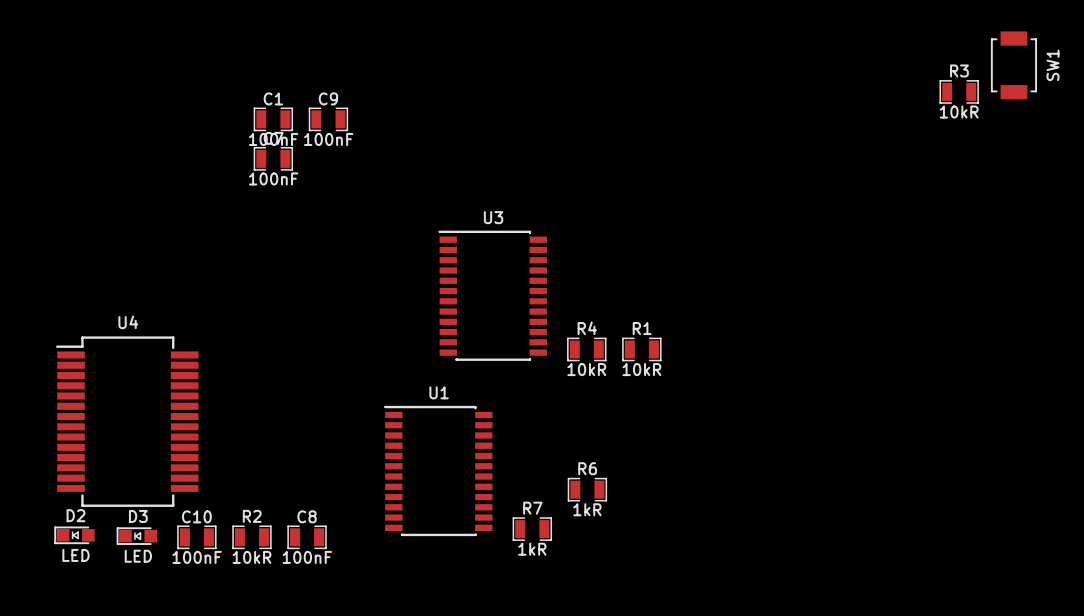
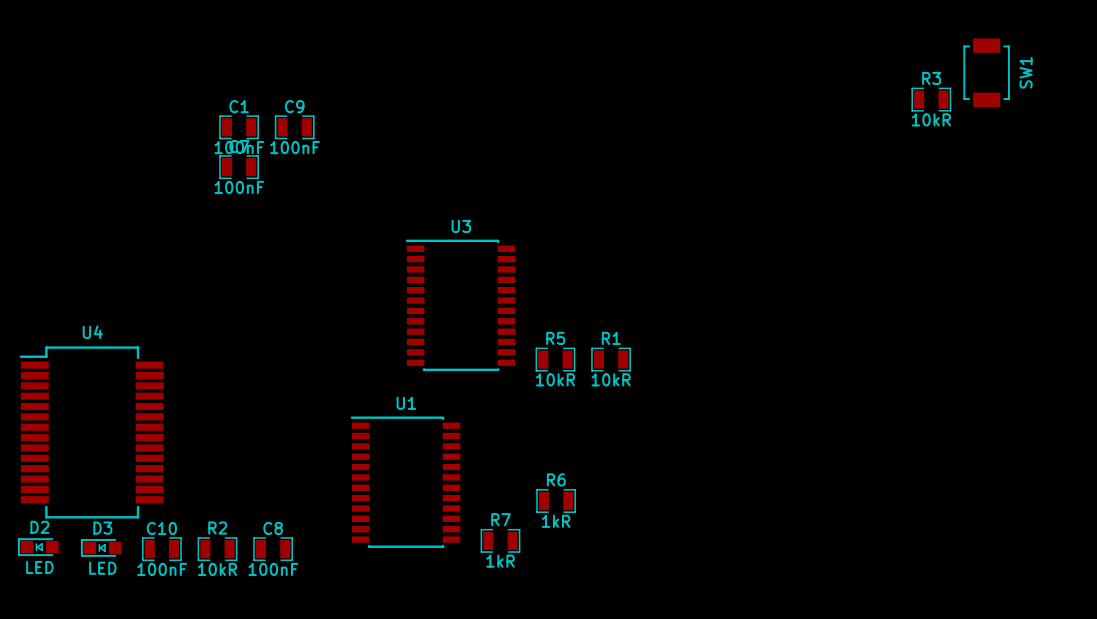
R4 name: R4 (587, 328) -> R5 (555, 338)

